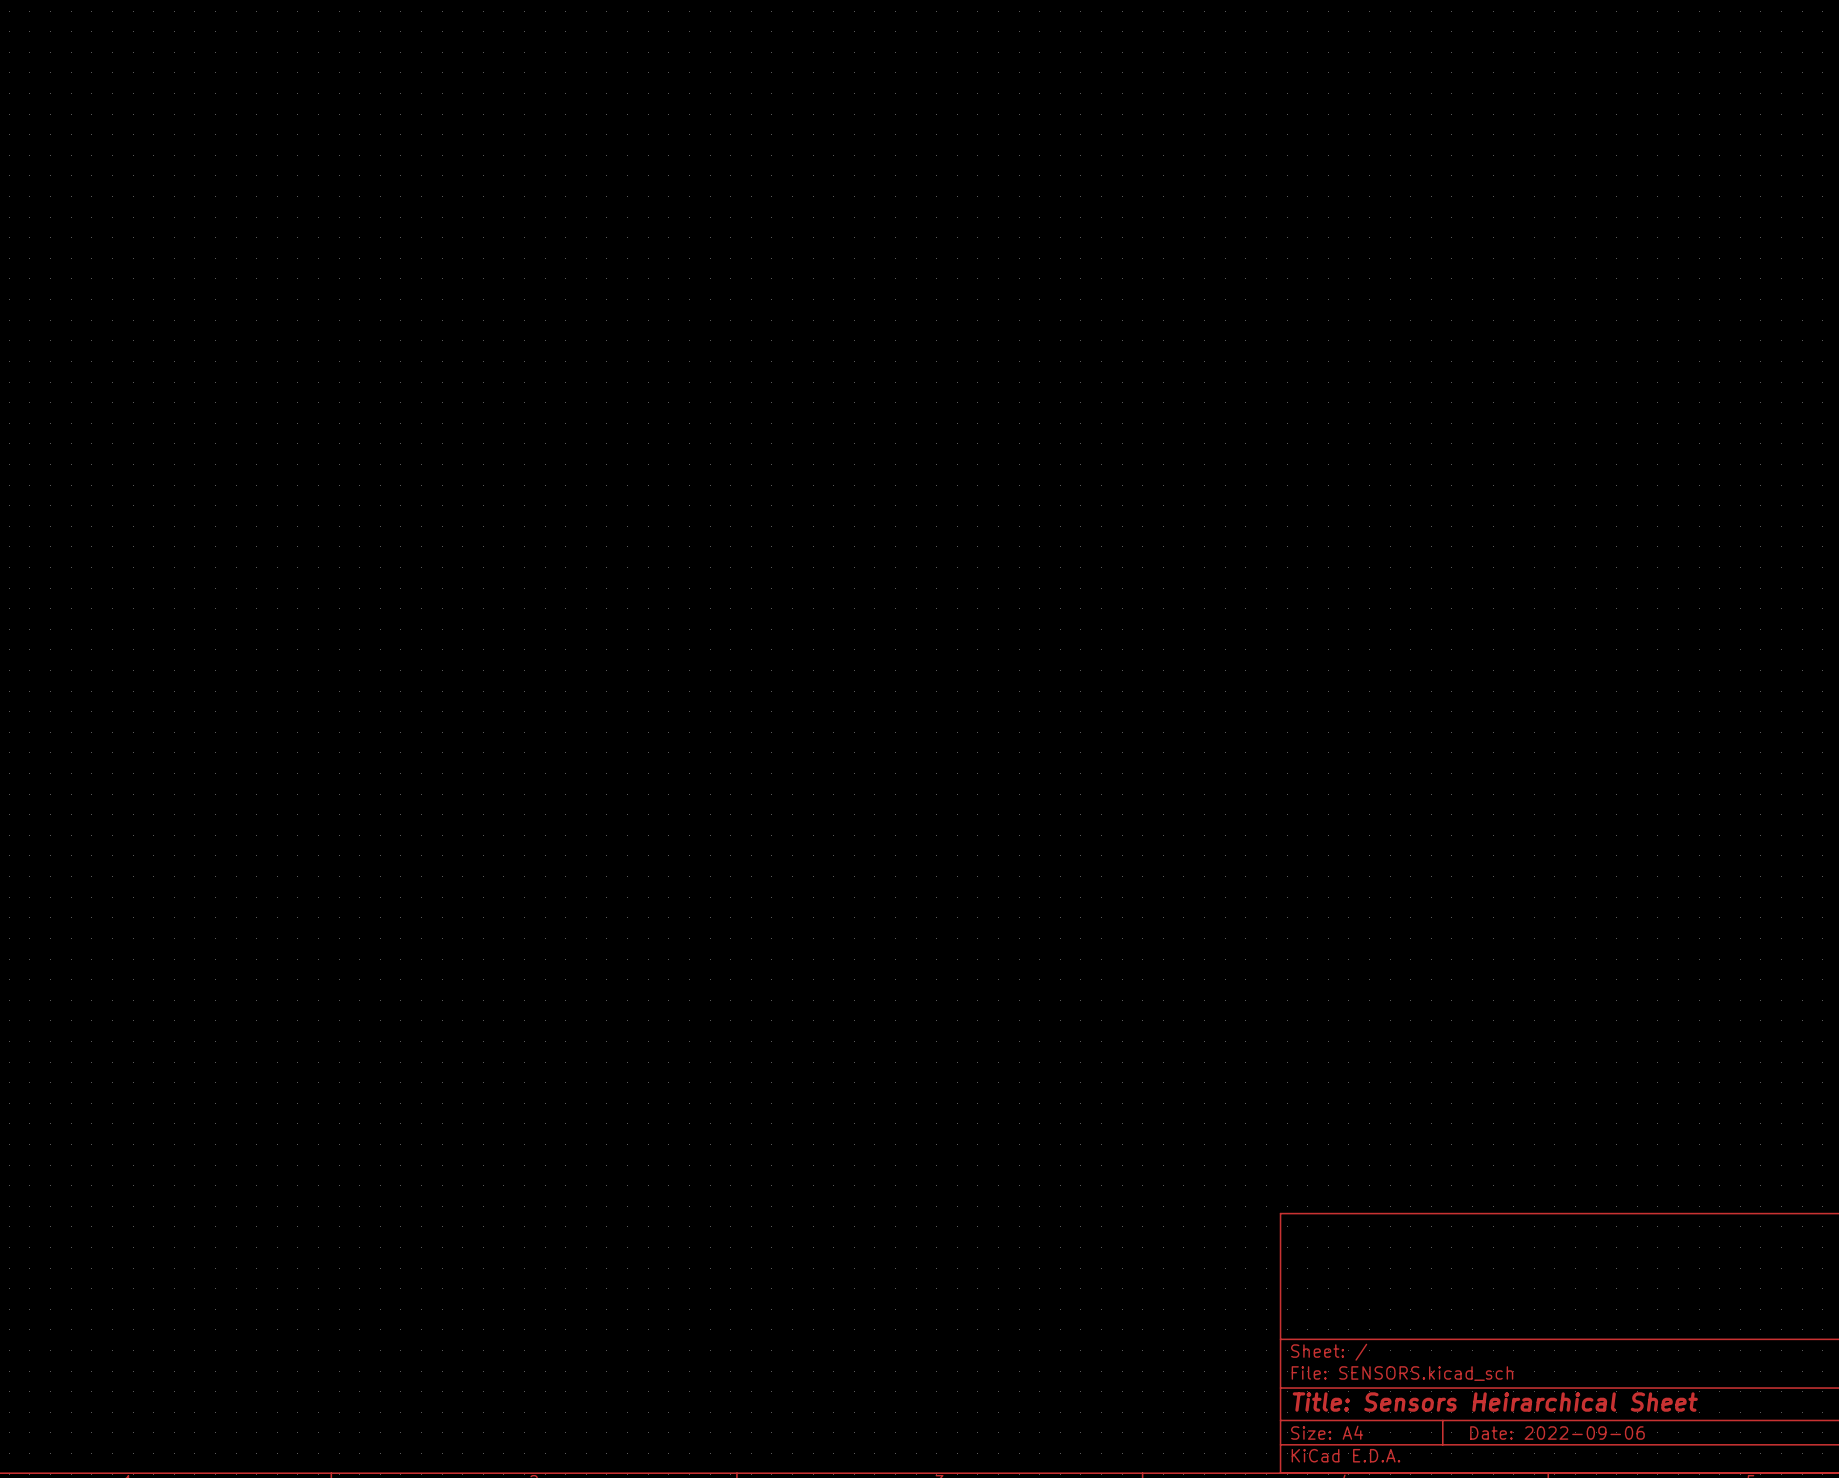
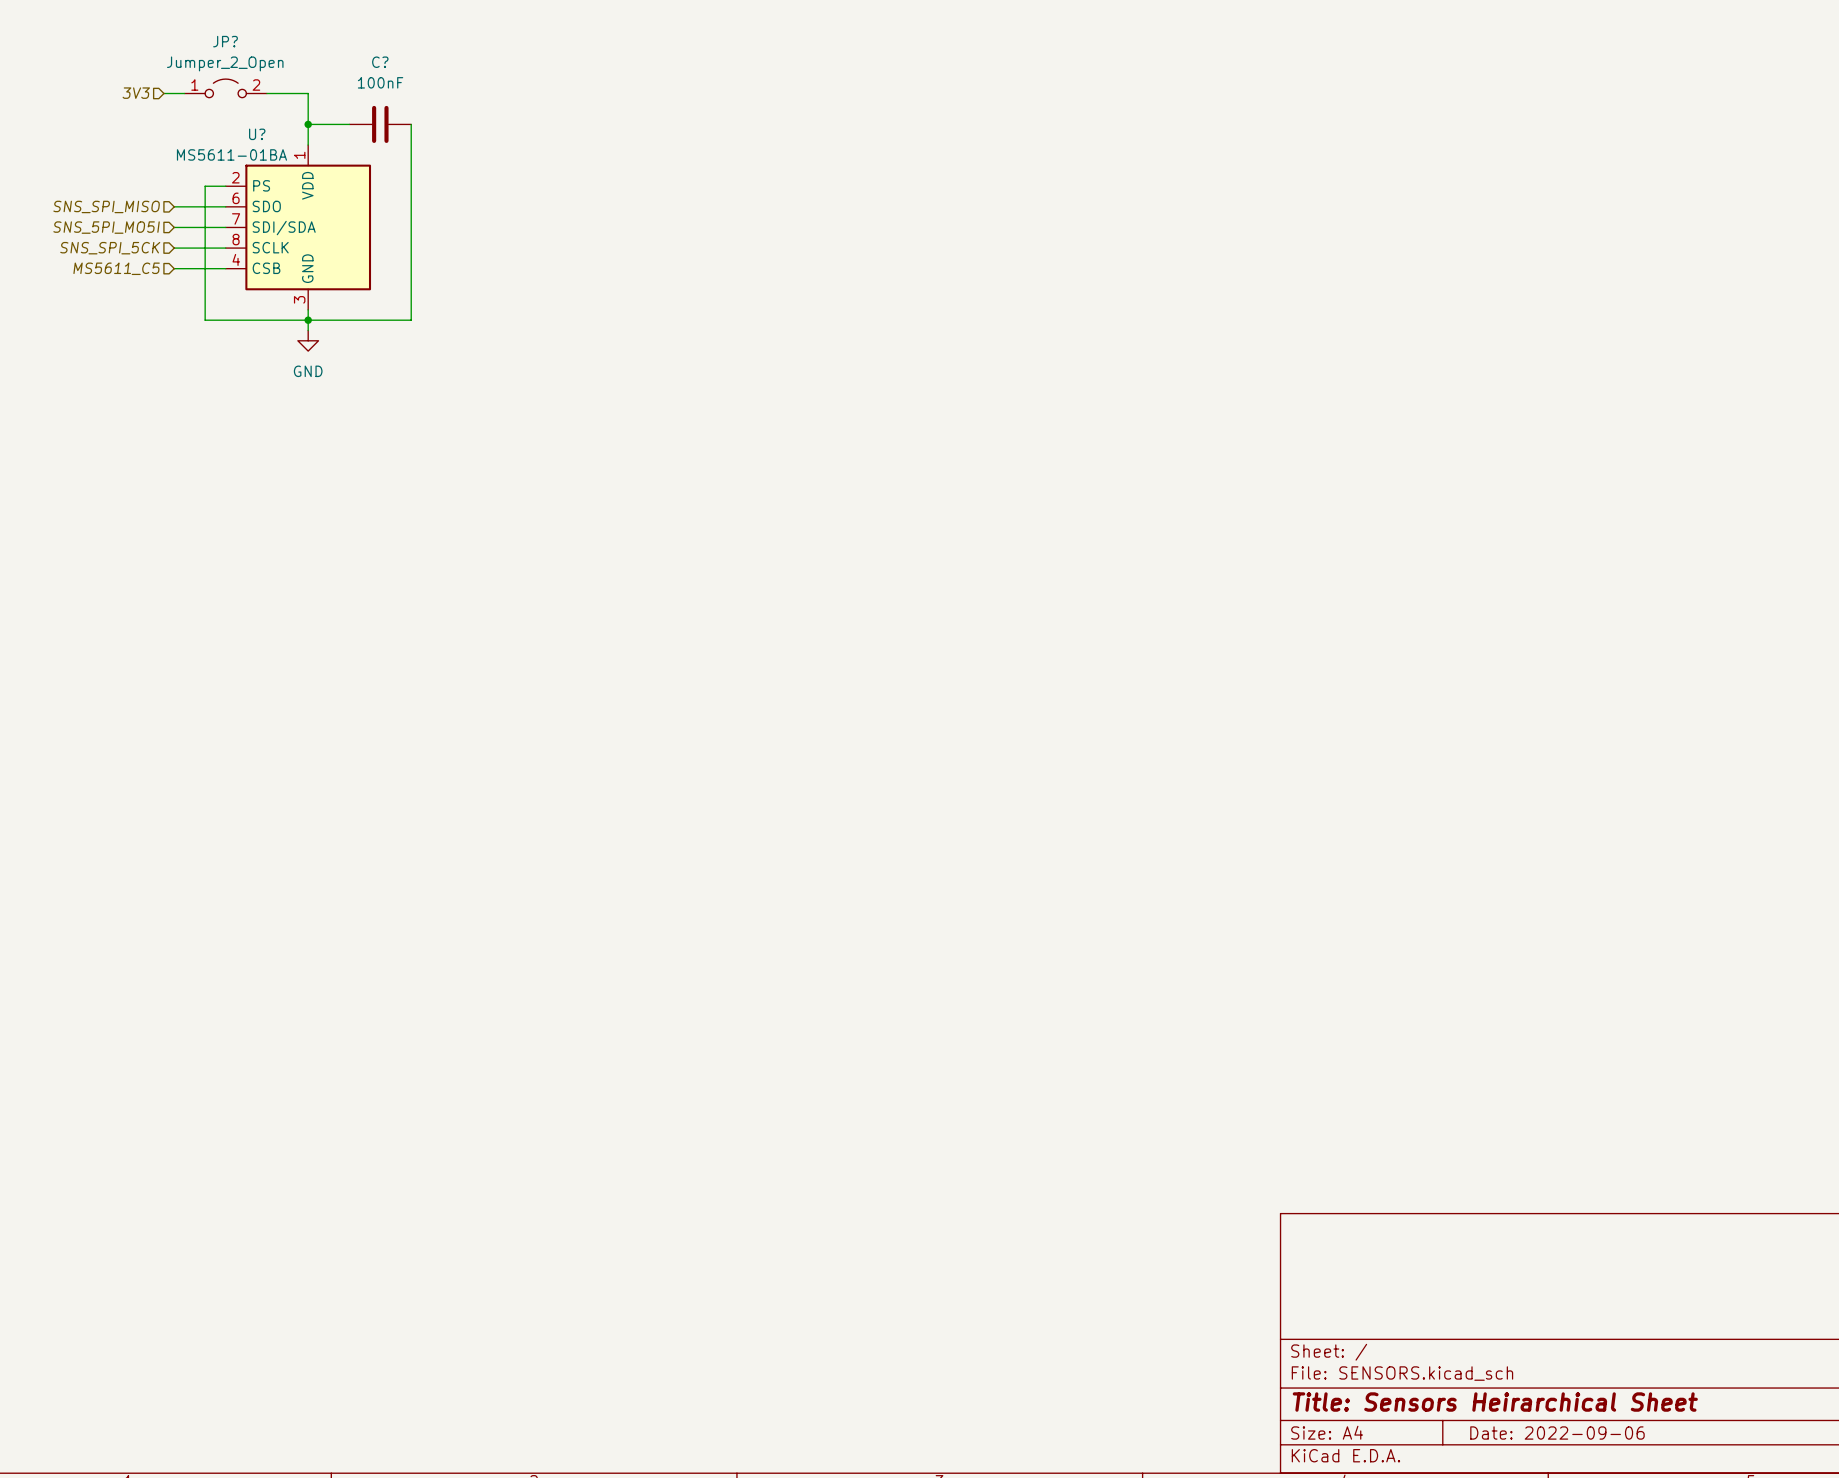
JP?: none -> Jumper_2_Open (225, 88)
hierarchical label: none -> 3V3 (136, 93)
wire: none -> (163, 93) (184, 93)
wire: none -> (266, 93) (308, 93) (308, 145)
wire: none -> (308, 124) (349, 124)
junction: none -> (308, 124)
C?: none -> 100nF (380, 124)
wire: none -> (411, 124) (411, 320) (205, 320) (205, 186) (225, 186)
hierarchical label: none -> SNS_SPI_MISO (106, 206)
wire: none -> (174, 206) (225, 206)
hierarchical label: none -> SNS_5PI_MO5I (106, 227)
wire: none -> (174, 227) (225, 227)
U?: none -> MS5611-01BA (298, 227)
hierarchical label: none -> SNS_SPI_5CK (110, 248)
wire: none -> (174, 248) (225, 248)
hierarchical label: none -> MS5611_C5 (116, 268)
wire: none -> (174, 268) (225, 268)
wire: none -> (308, 309) (308, 330)
junction: none -> (308, 320)
power symbol: none -> GND (308, 340)

